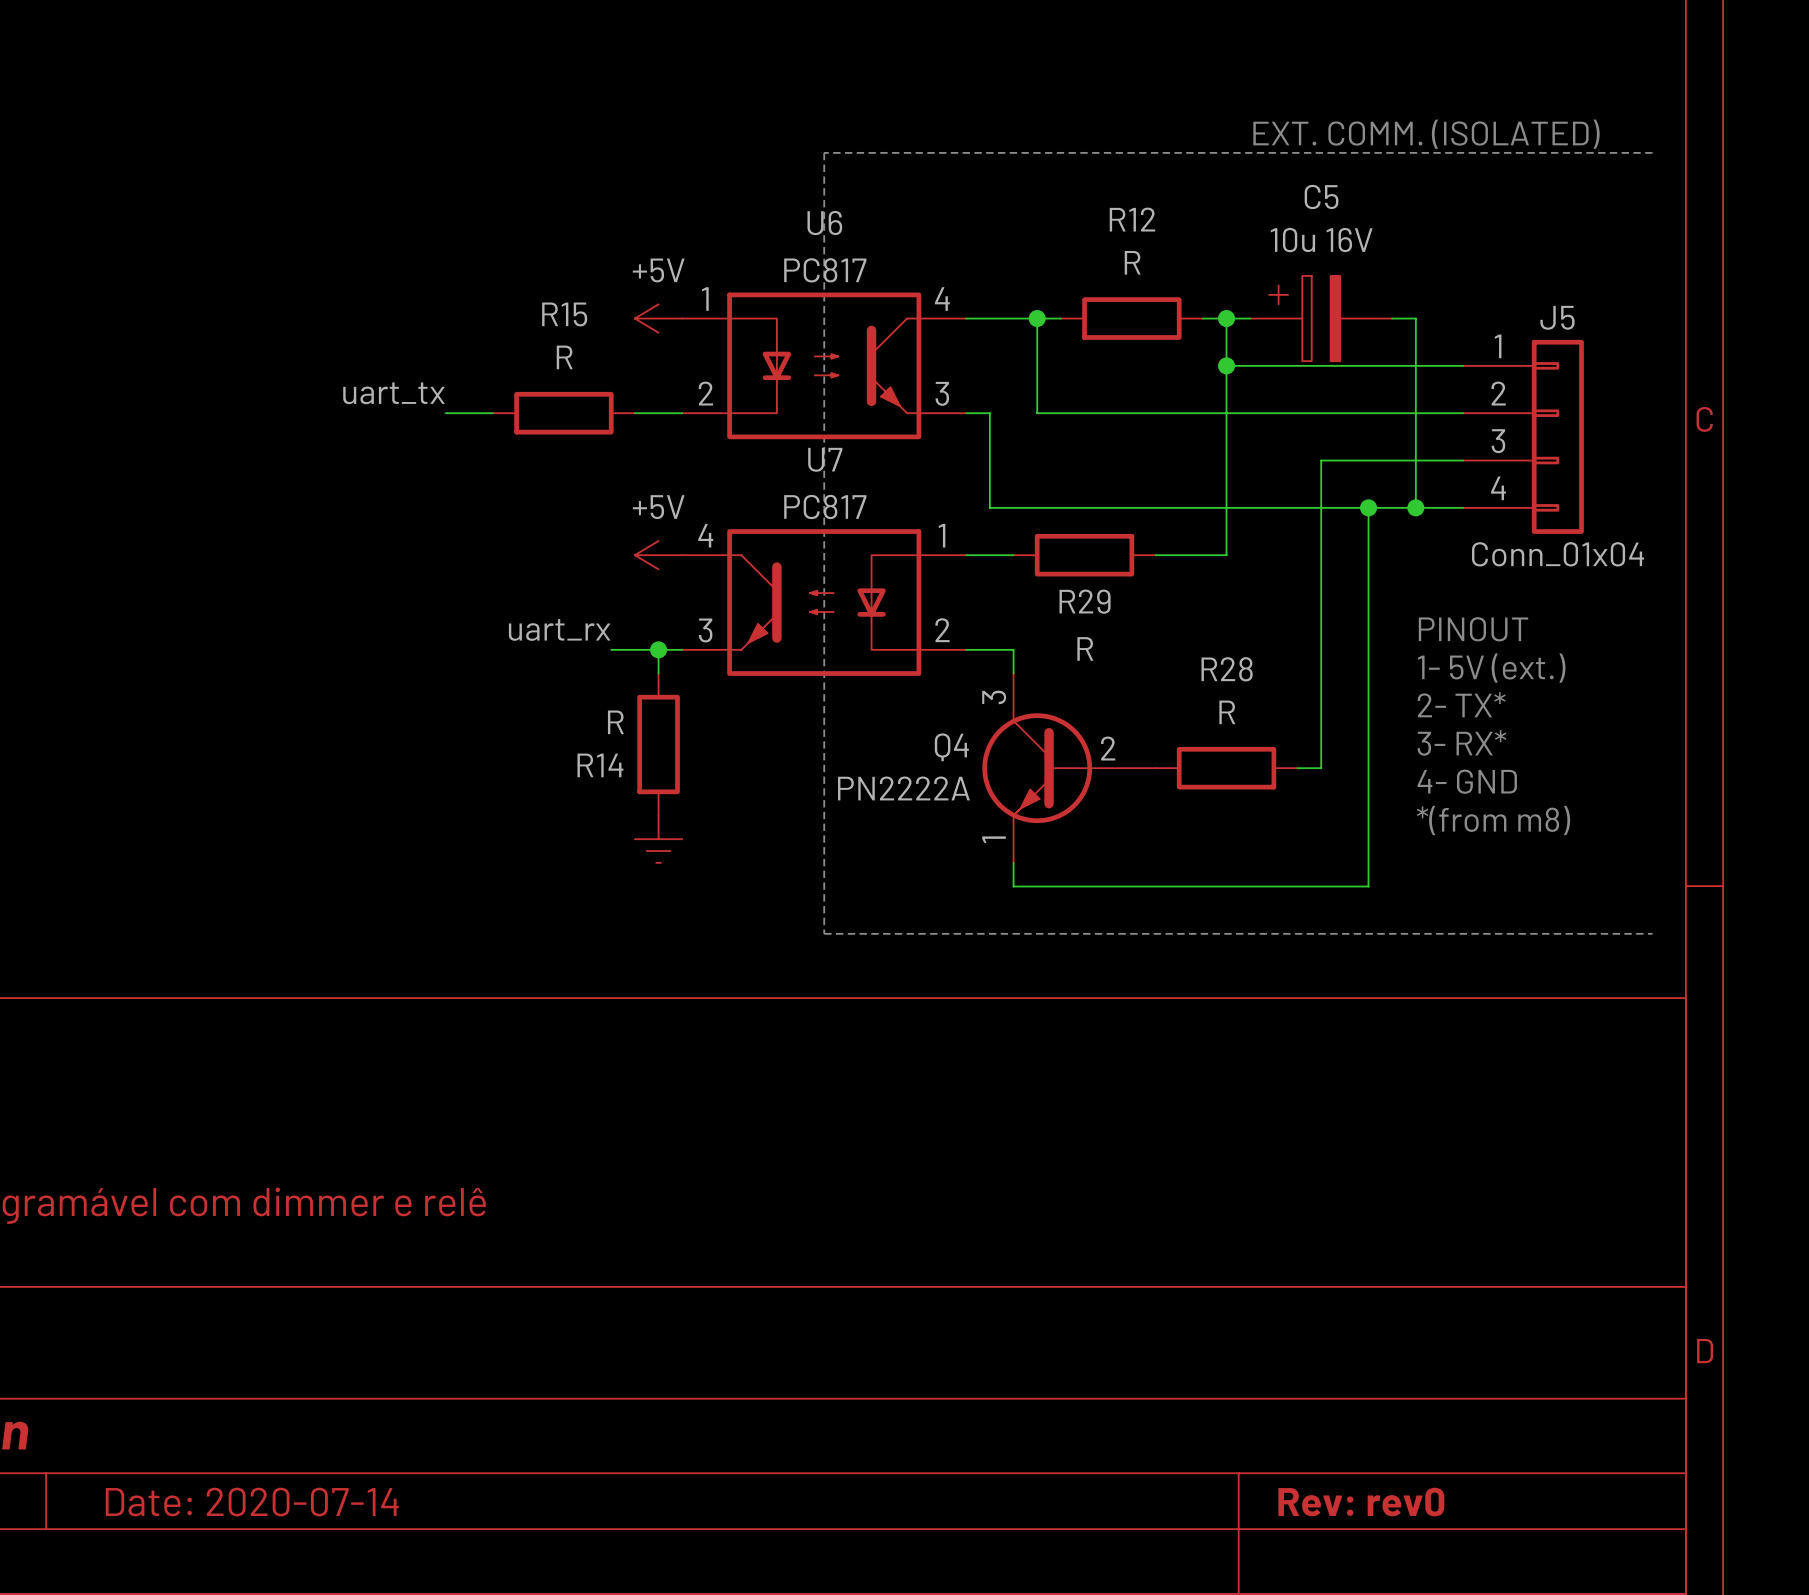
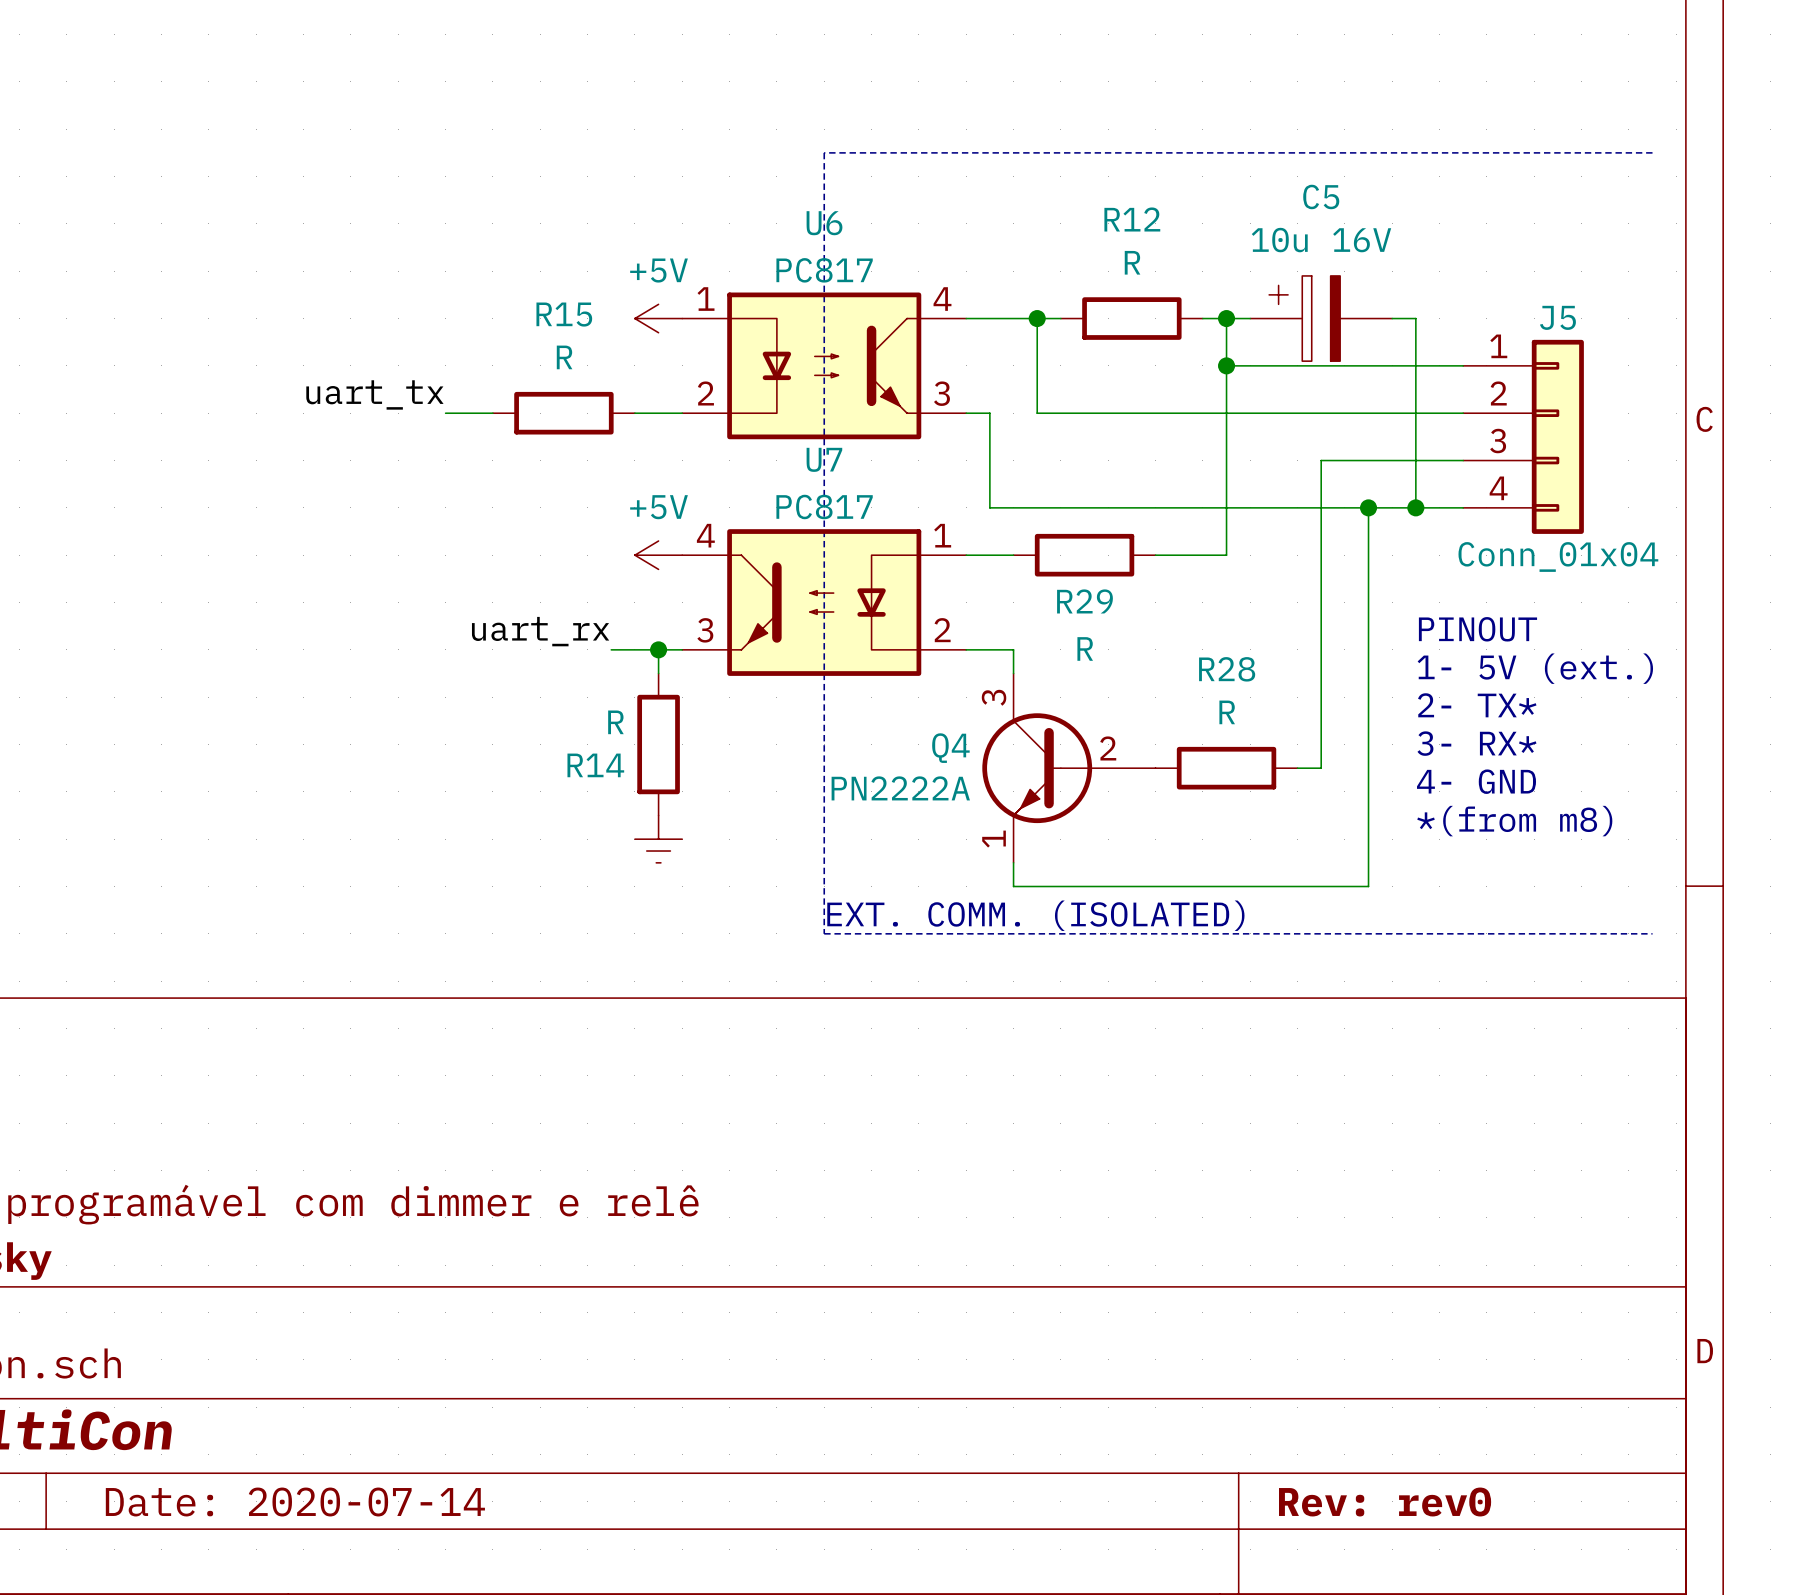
text: EXT. COMM. (ISOLATED) (1426, 134) -> none
text: none -> EXT. COMM. (ISOLATED) (1035, 915)

